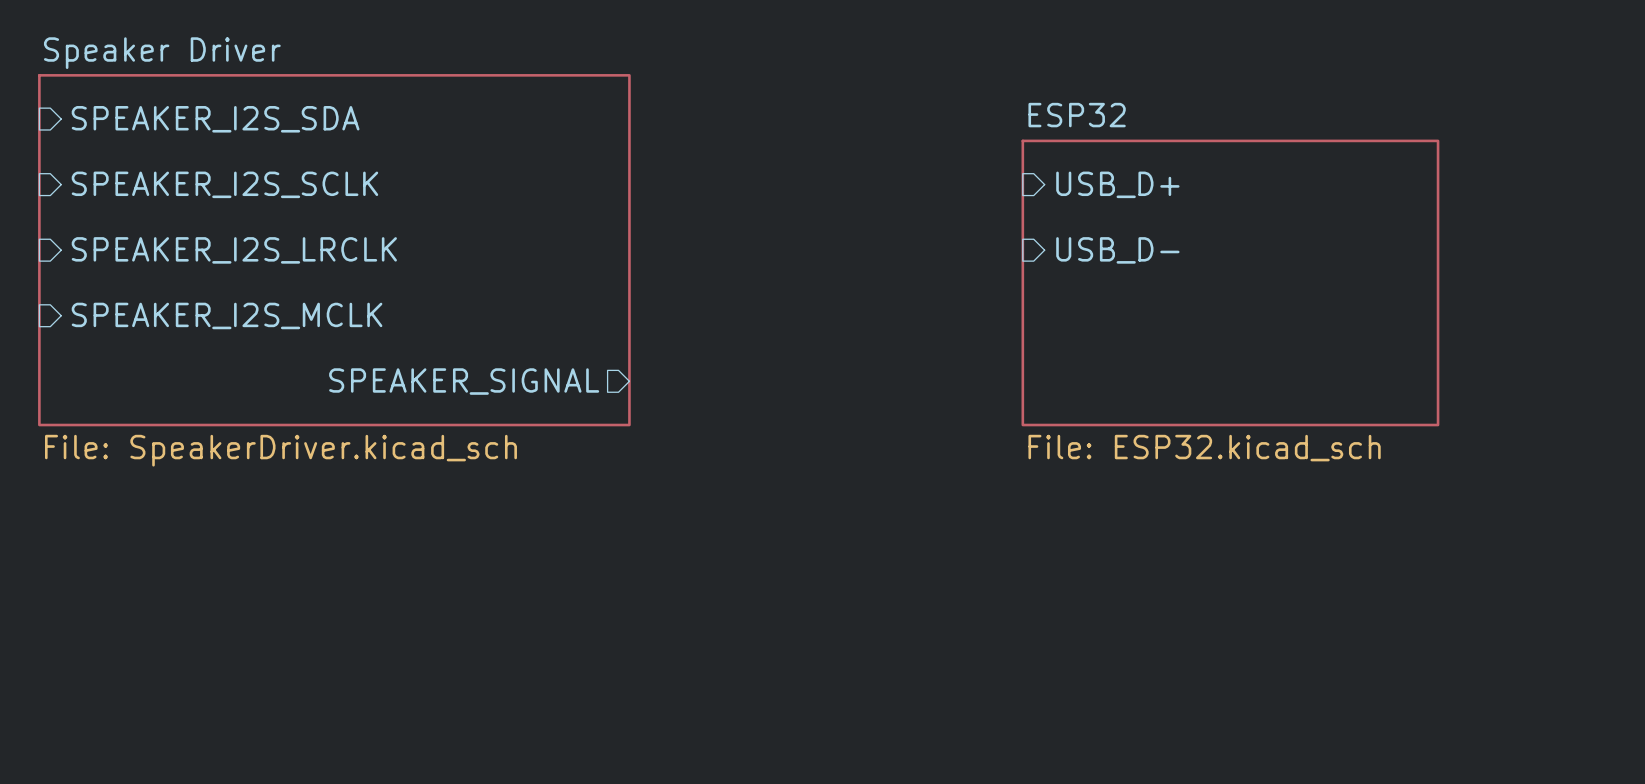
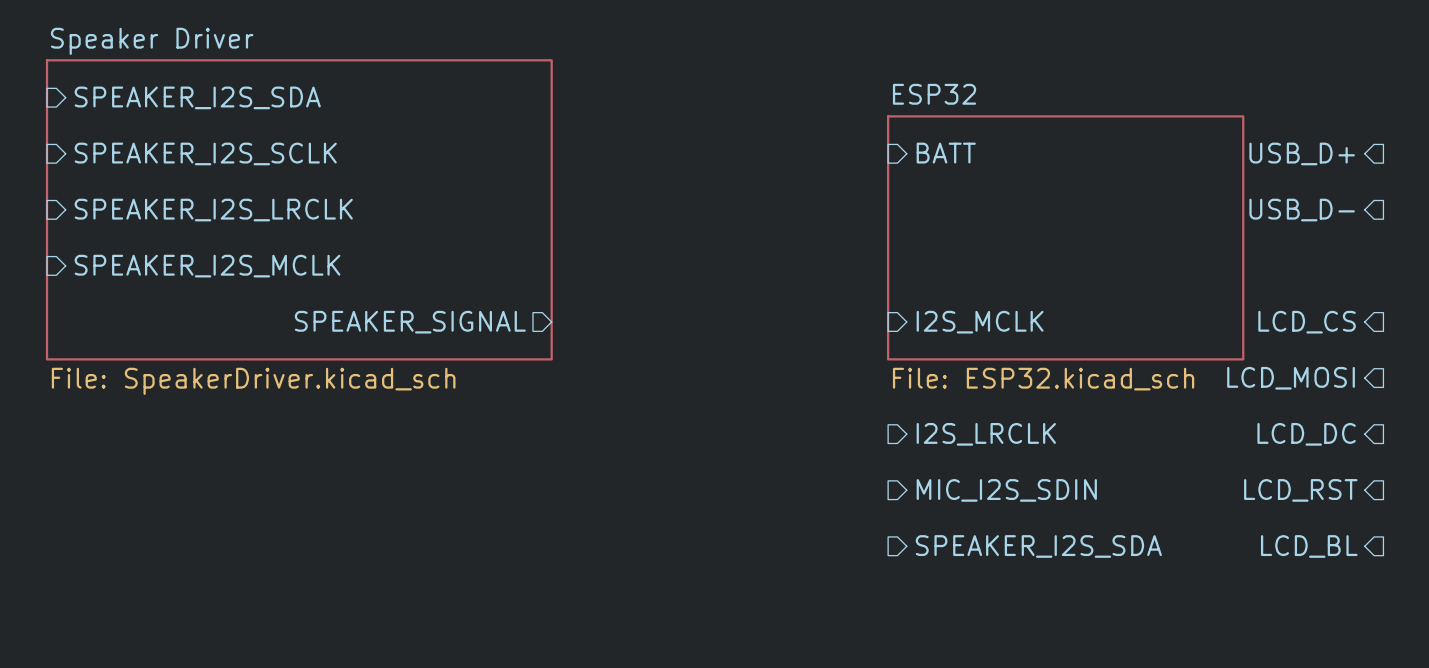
sheet pin: USB_D+ (1117, 184) -> BATT (946, 153)
sheet pin: none -> USB_D+ (1302, 153)
sheet pin: USB_D- (1117, 250) -> none
sheet pin: none -> USB_D- (1302, 210)
sheet pin: none -> I2S_MCLK (980, 322)
sheet pin: none -> LCD_CS (1307, 322)
sheet pin: none -> LCD_MOSI (1291, 378)
sheet pin: none -> I2S_LRCLK (986, 434)
sheet pin: none -> LCD_DC (1306, 434)
sheet pin: none -> MIC_I2S_SDIN (1006, 490)
sheet pin: none -> LCD_RST (1300, 490)
sheet pin: none -> SPEAKER_I2S_SDA (1038, 546)
sheet pin: none -> LCD_BL (1309, 546)

